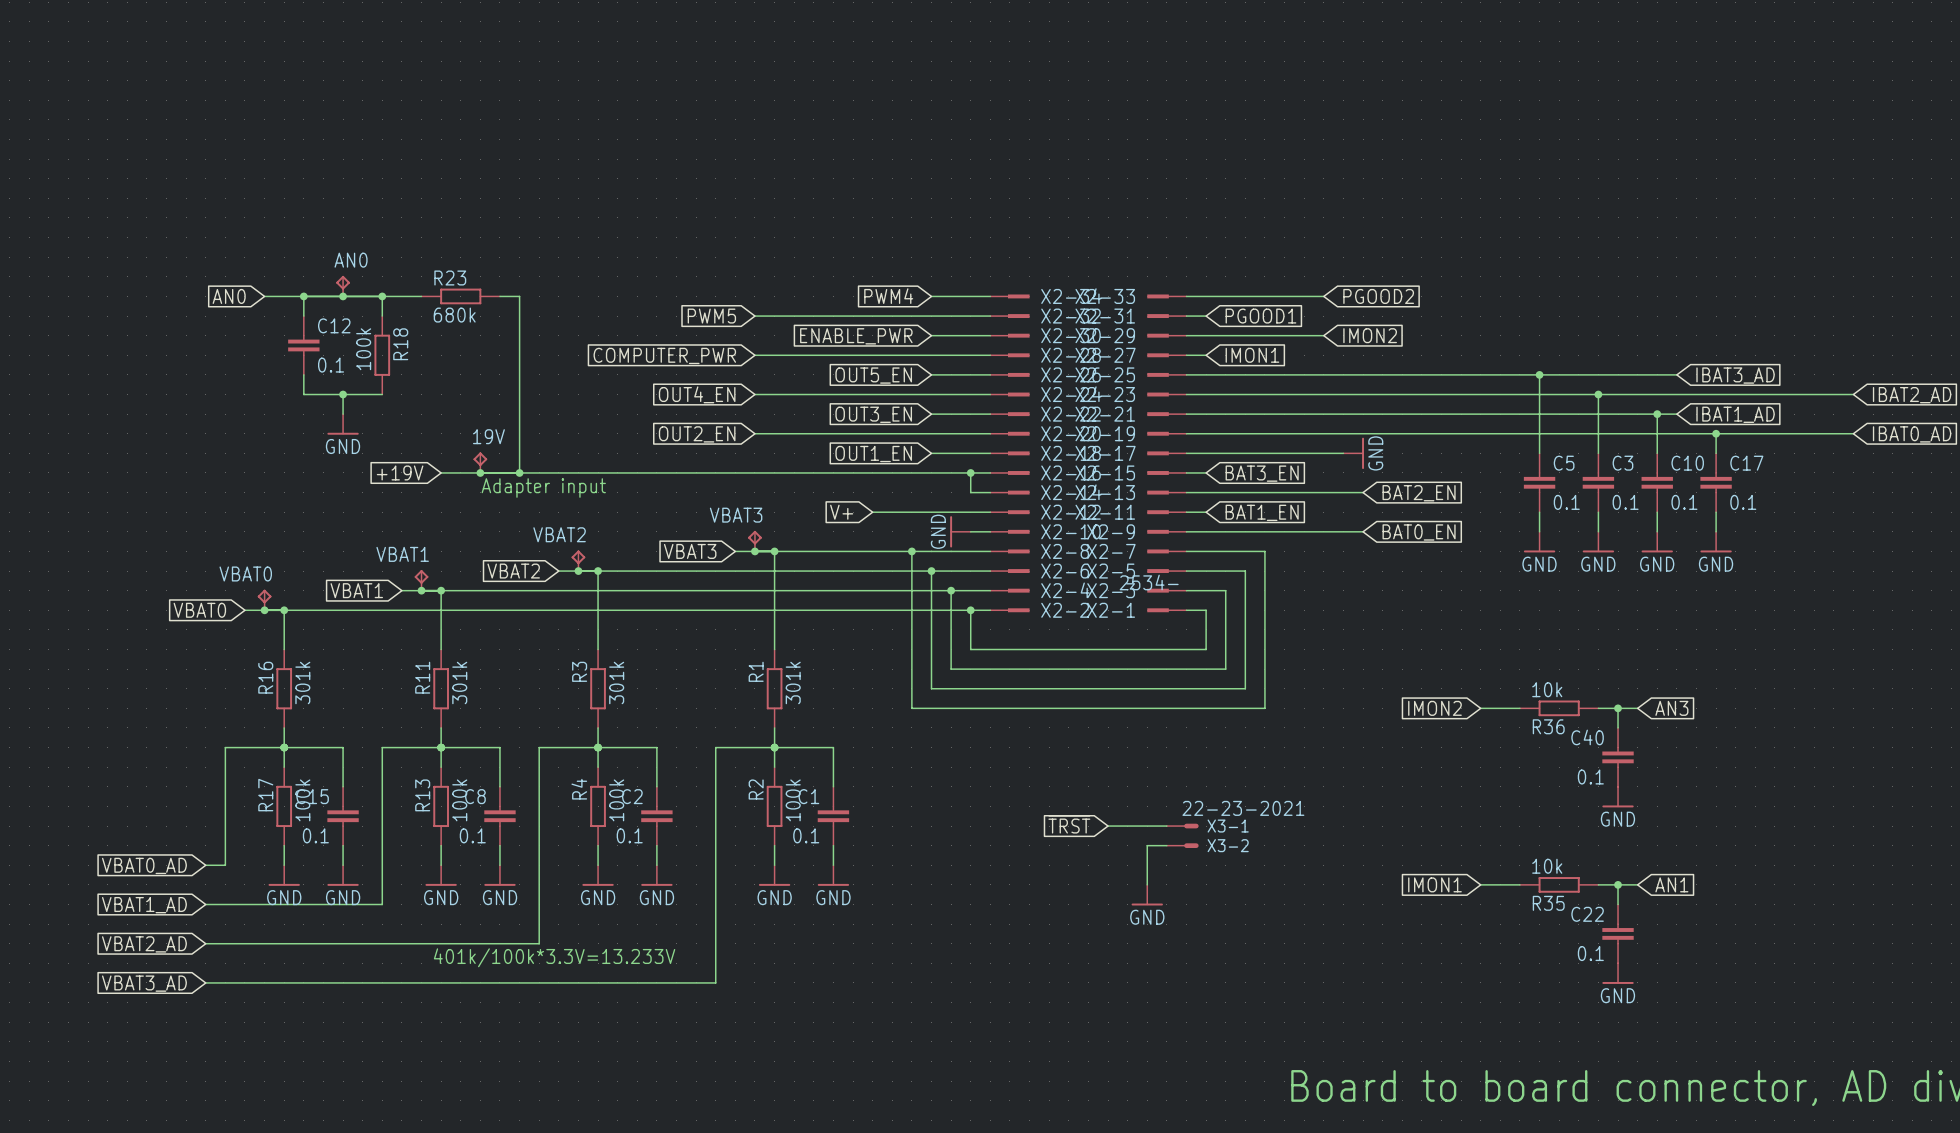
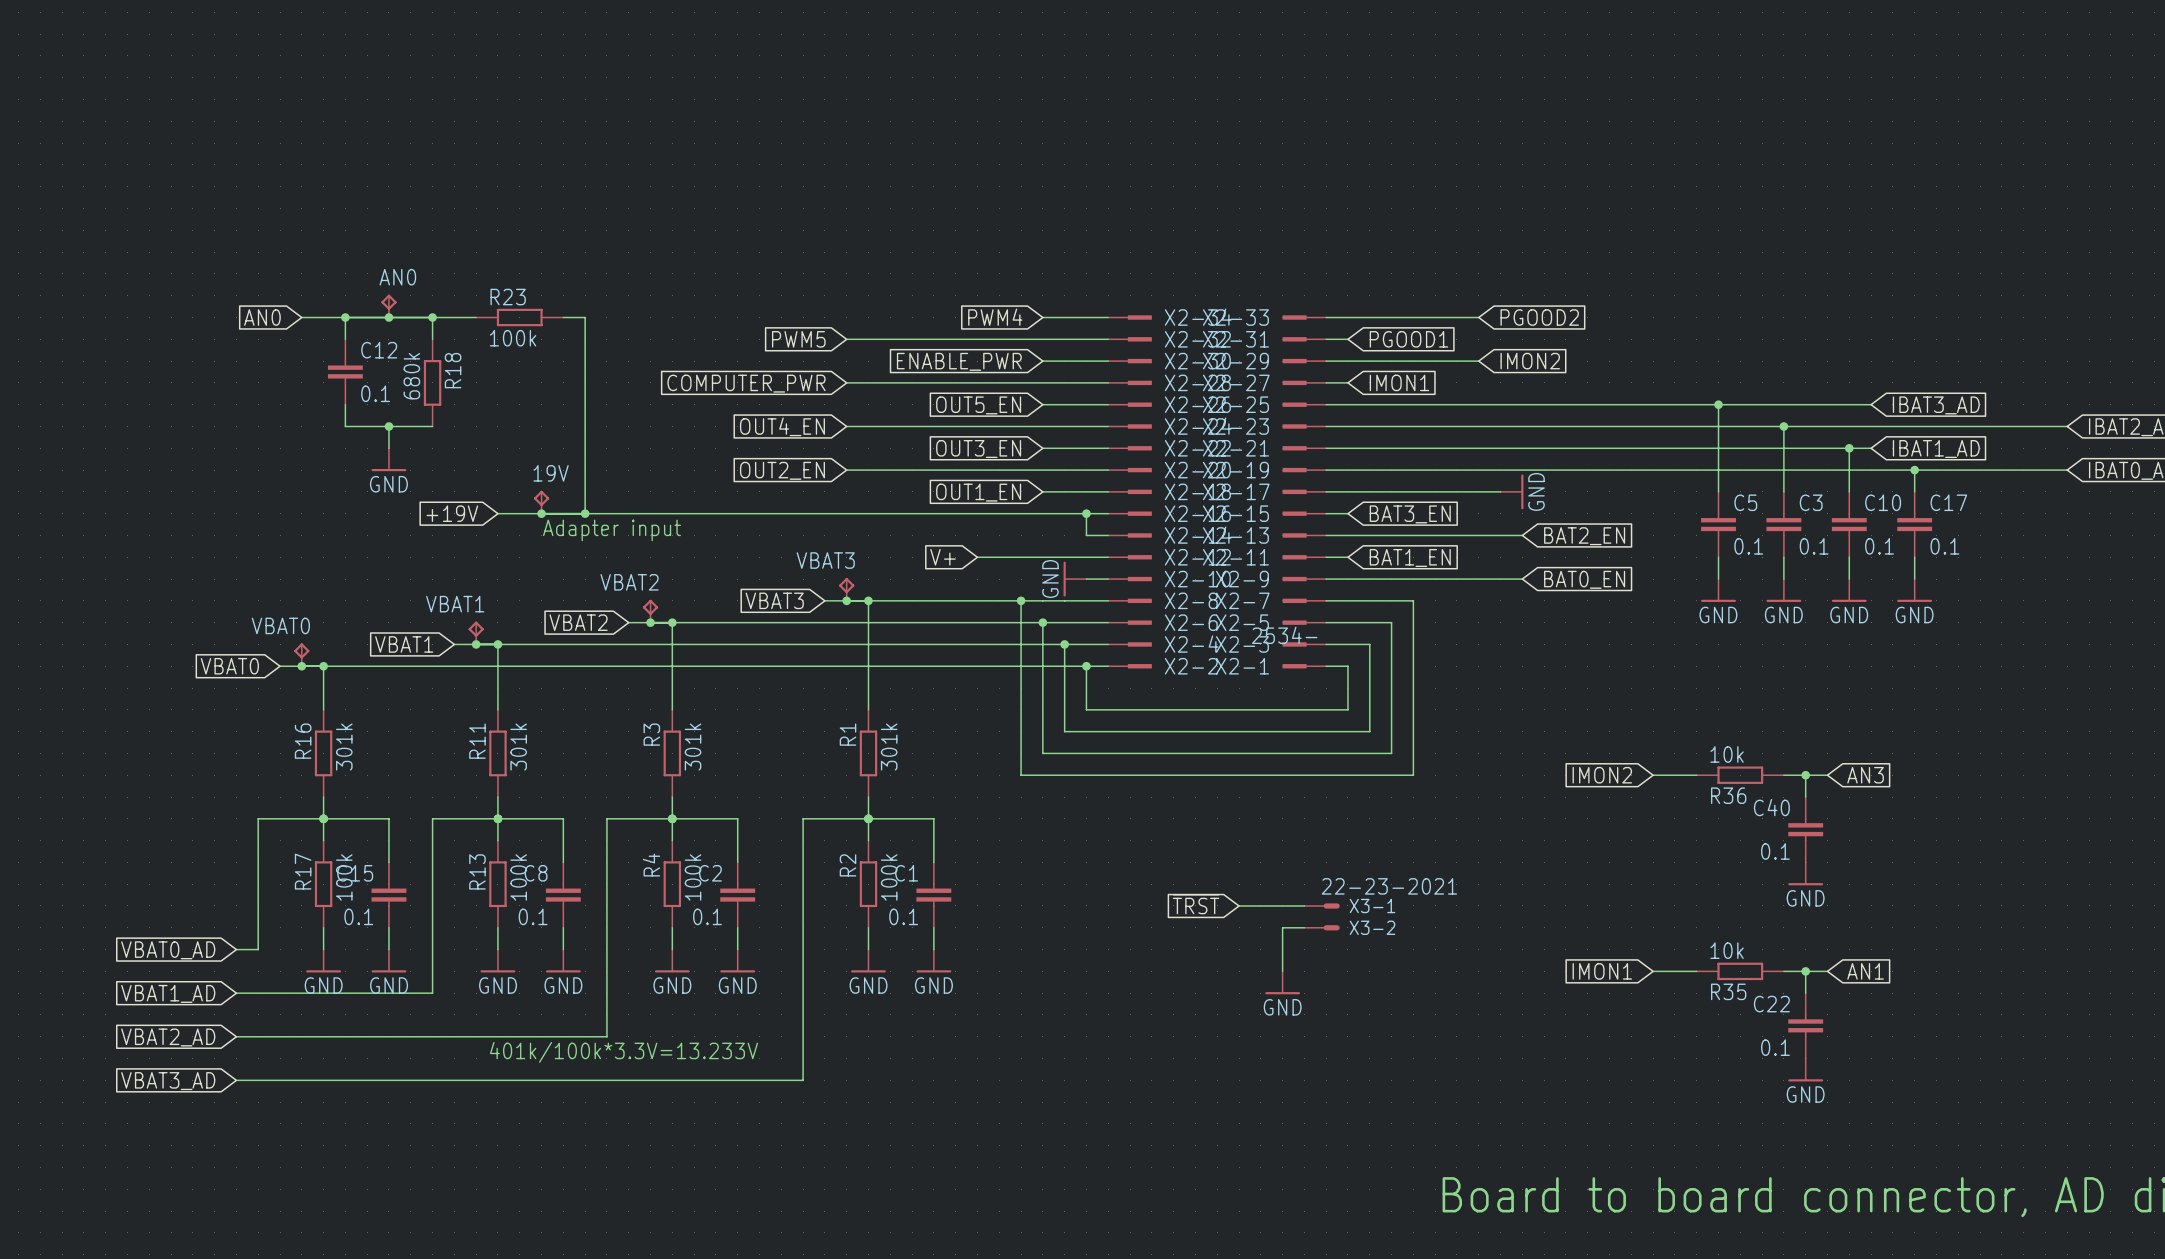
R23 value: 680k (454, 315) -> 100k (513, 338)
R18 value: 100k (363, 349) -> 680k (411, 376)

